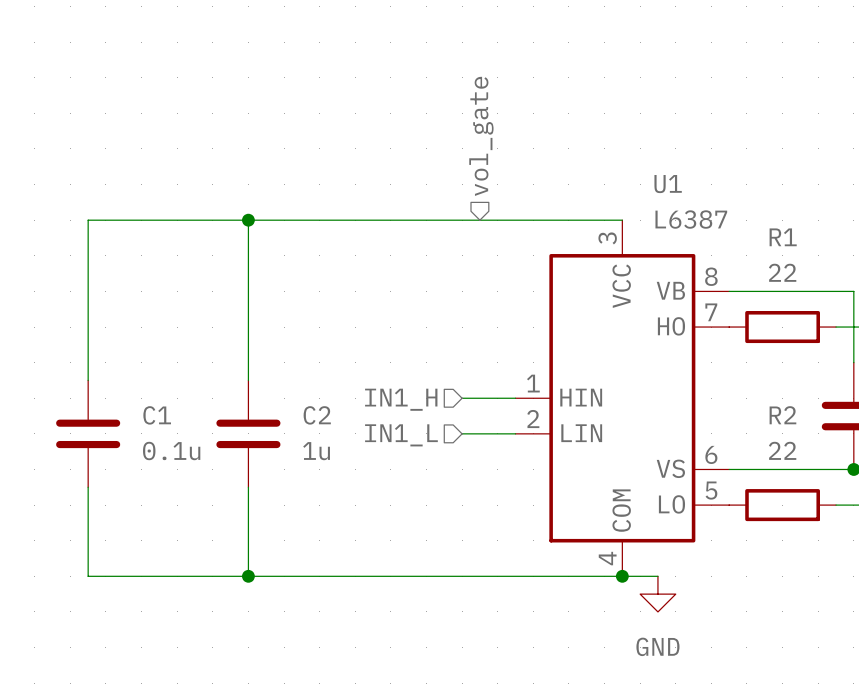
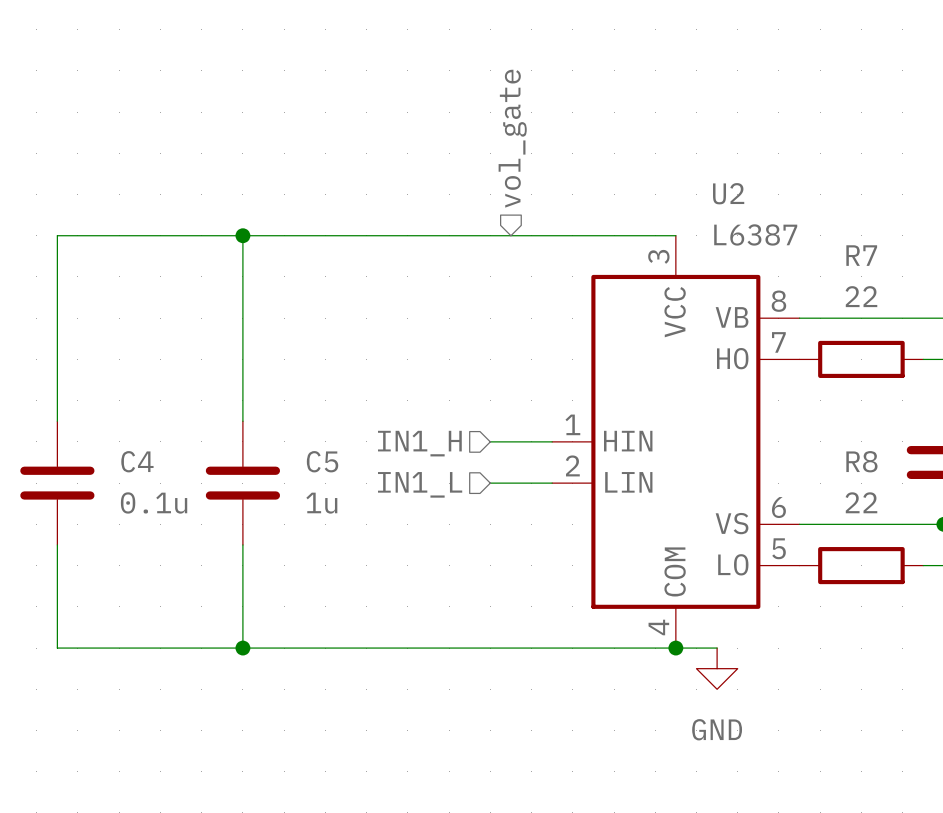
U1 name: U1 (668, 184) -> U2 (728, 193)
R1 name: R1 (783, 237) -> R7 (861, 255)
C1 name: C1 (157, 415) -> C4 (137, 461)
C2 name: C2 (317, 415) -> C5 (322, 461)
R2 name: R2 (782, 415) -> R8 (861, 461)

